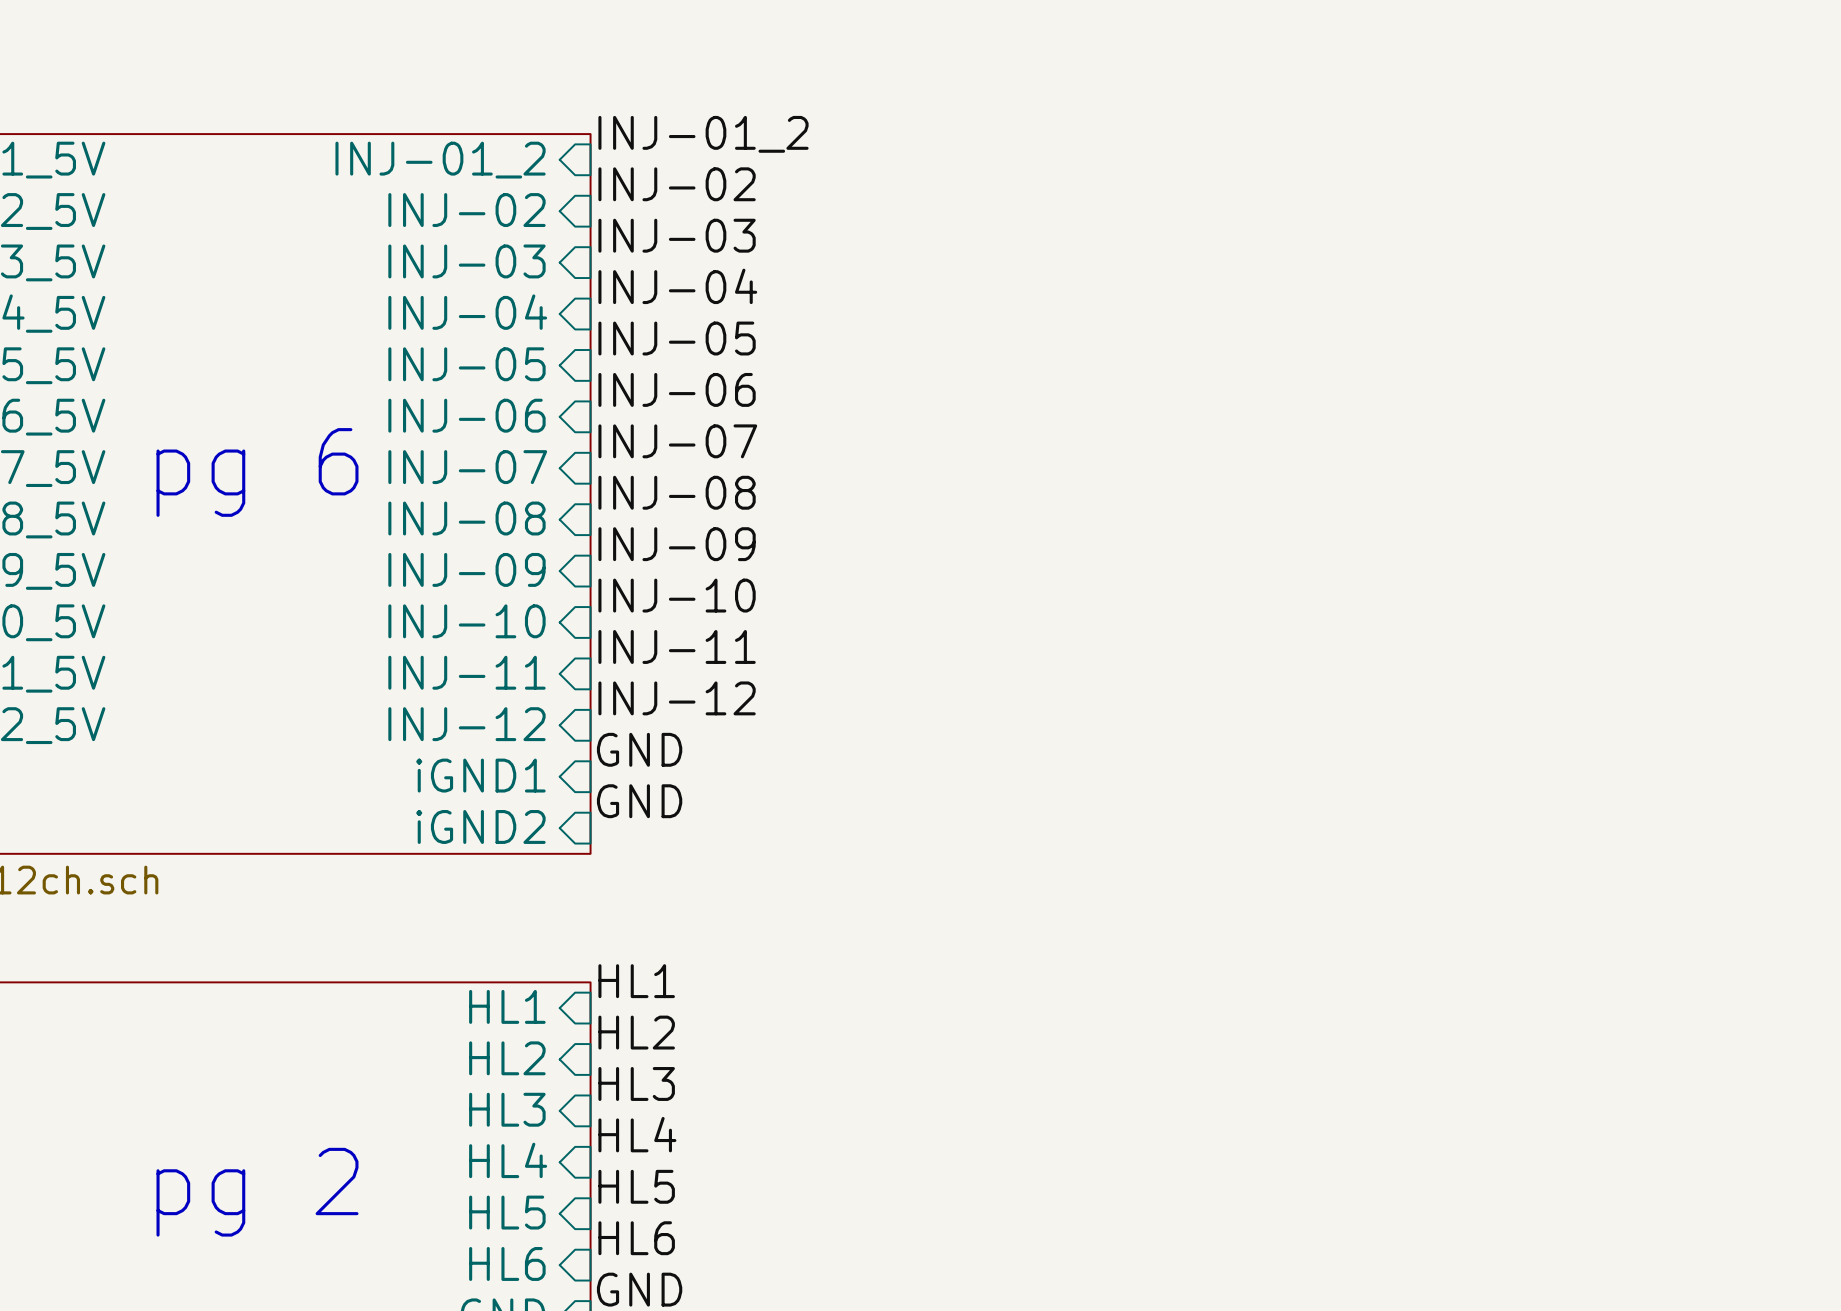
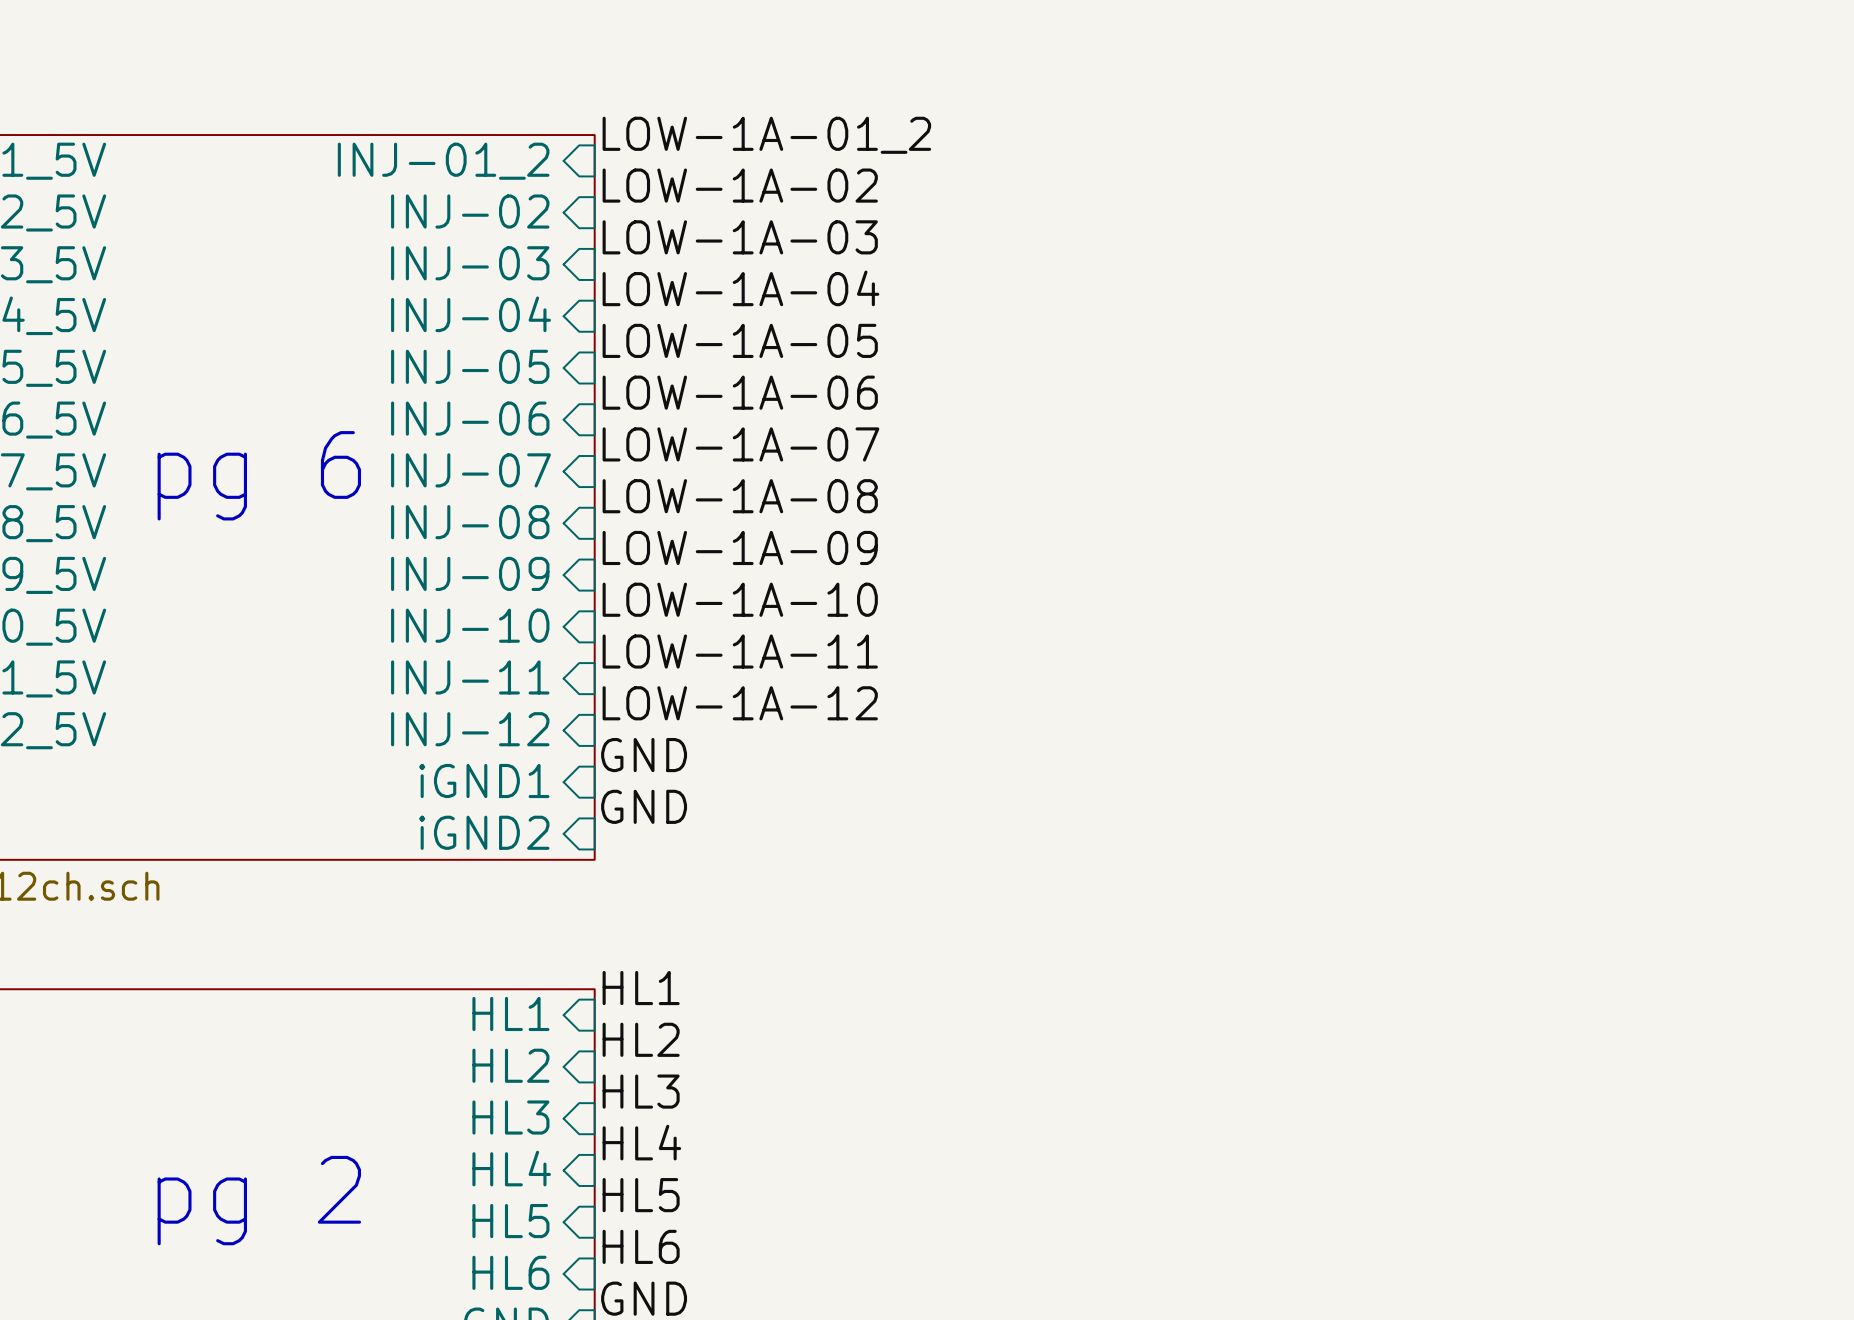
label: INJ-01_2 (703, 134) -> LOW-1A-01_2 (766, 135)
label: INJ-02 (677, 184) -> LOW-1A-02 (740, 185)
label: INJ-03 (677, 235) -> LOW-1A-03 (740, 237)
label: INJ-04 (677, 286) -> LOW-1A-04 (740, 288)
label: INJ-05 (677, 338) -> LOW-1A-05 (740, 340)
label: INJ-06 (677, 389) -> LOW-1A-06 (740, 392)
label: INJ-07 (677, 441) -> LOW-1A-07 (740, 444)
label: INJ-08 (677, 492) -> LOW-1A-08 (740, 496)
label: INJ-09 (677, 544) -> LOW-1A-09 (740, 547)
label: INJ-10 (677, 595) -> LOW-1A-10 (740, 599)
label: INJ-11 (677, 646) -> LOW-1A-11 (740, 651)
label: INJ-12 (677, 698) -> LOW-1A-12 (740, 703)

